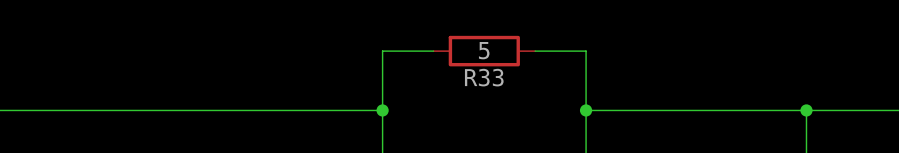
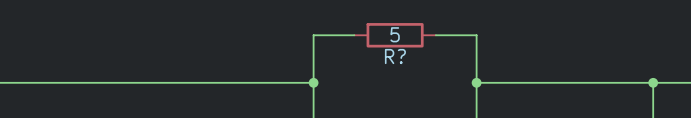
R33 name: R33 (484, 77) -> R? (395, 56)

